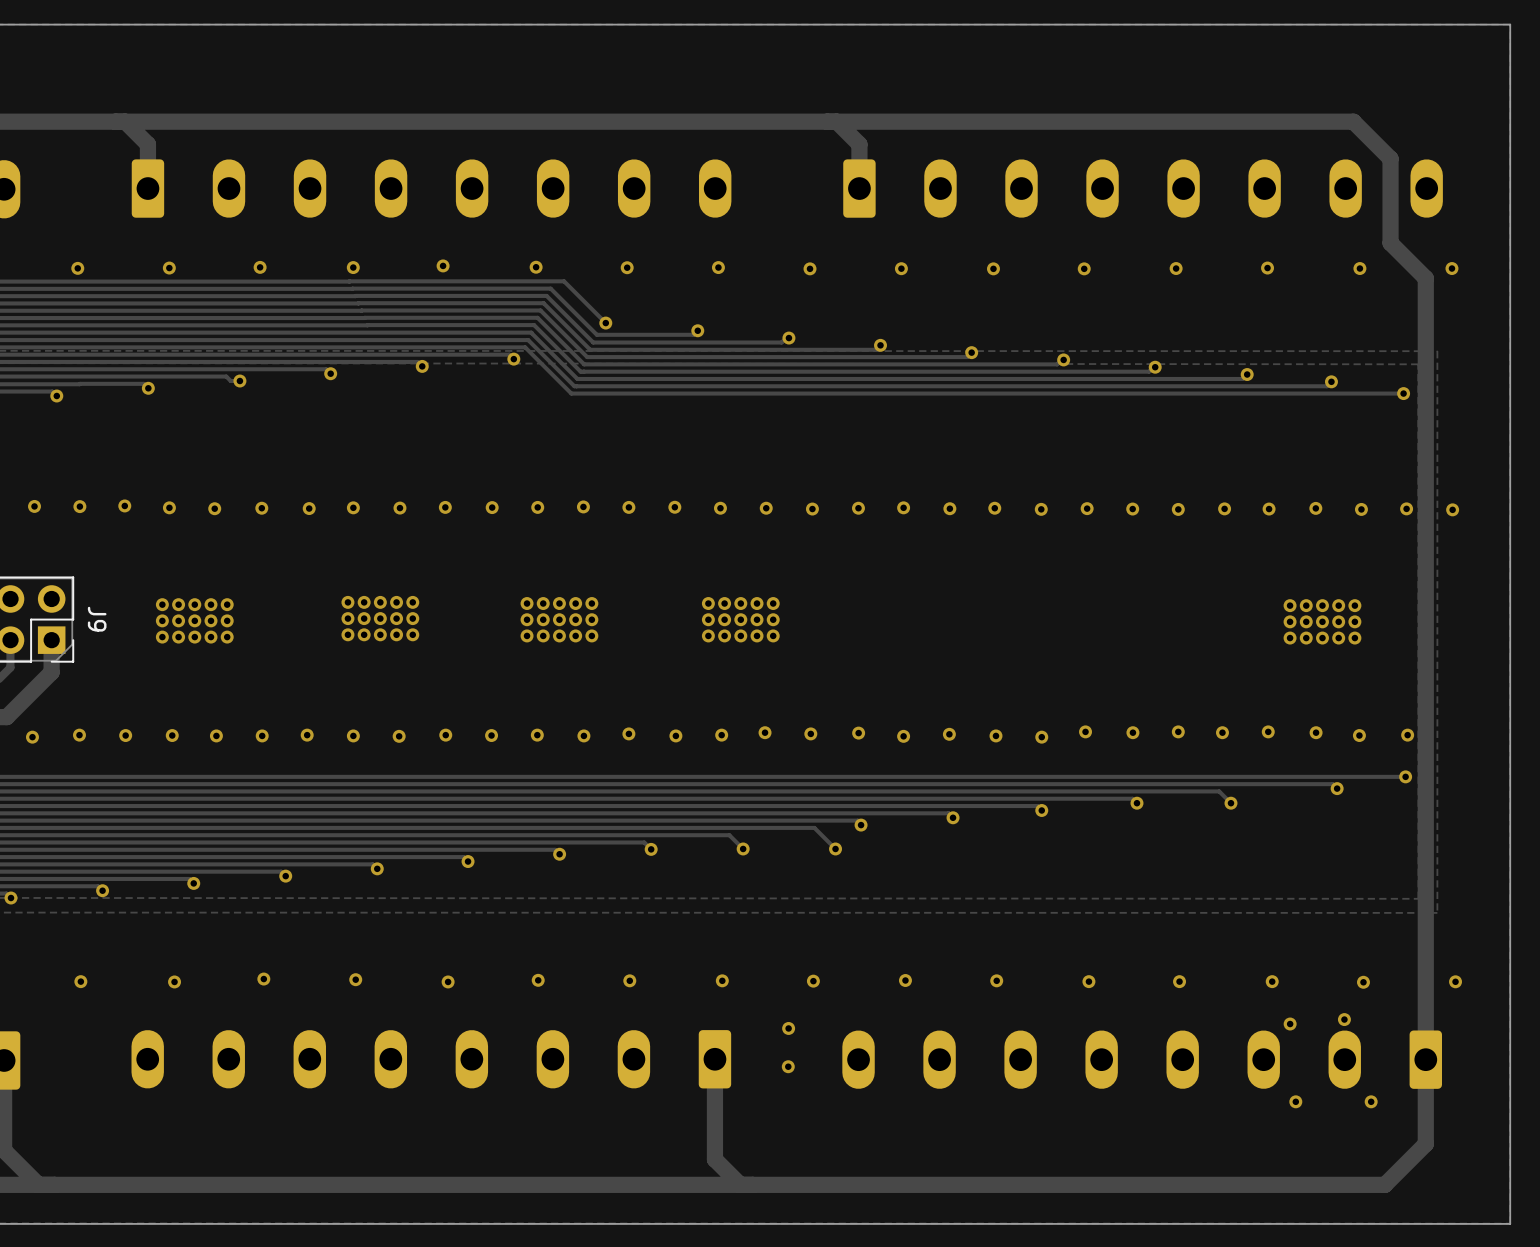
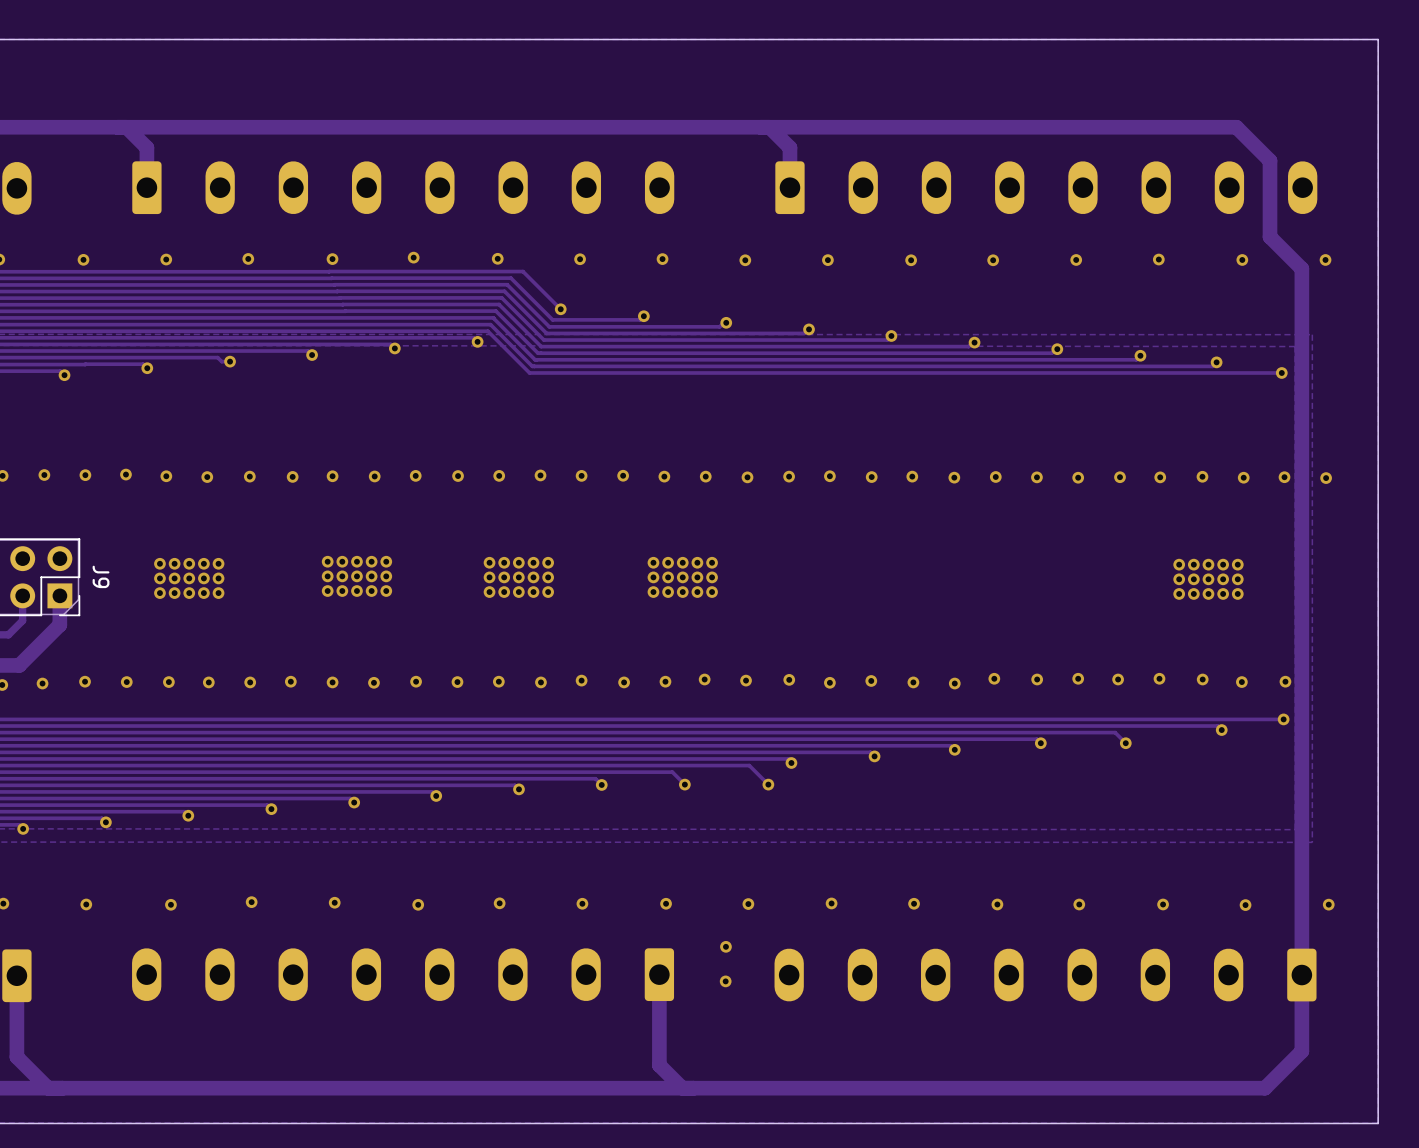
via: (1344, 1019) -> none
via: (1290, 1024) -> none
via: (1295, 1101) -> none
via: (1371, 1101) -> none

